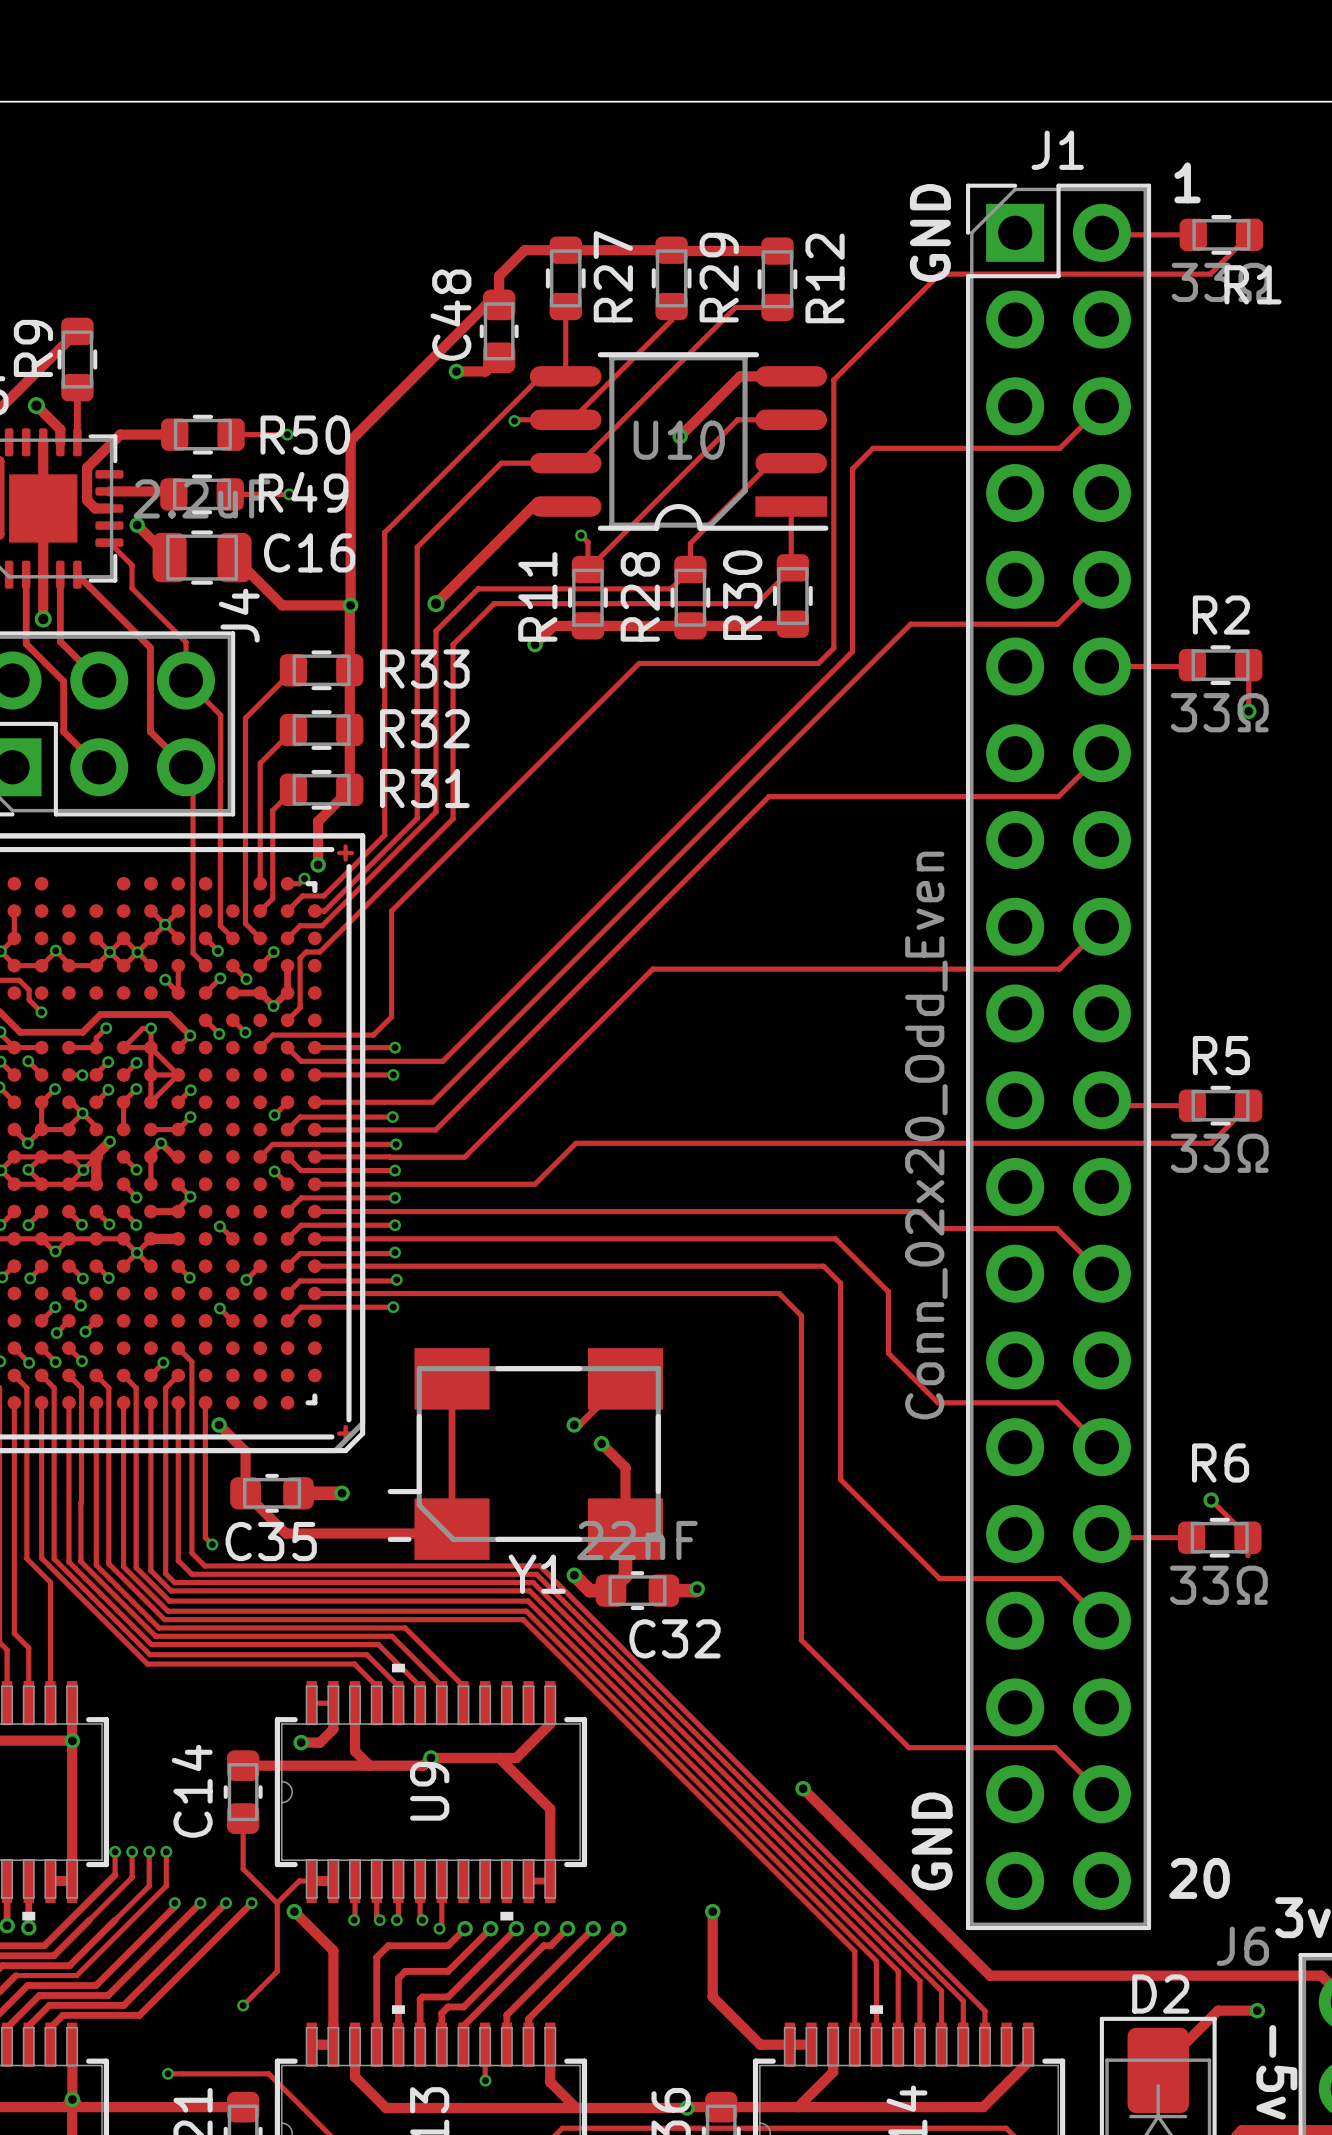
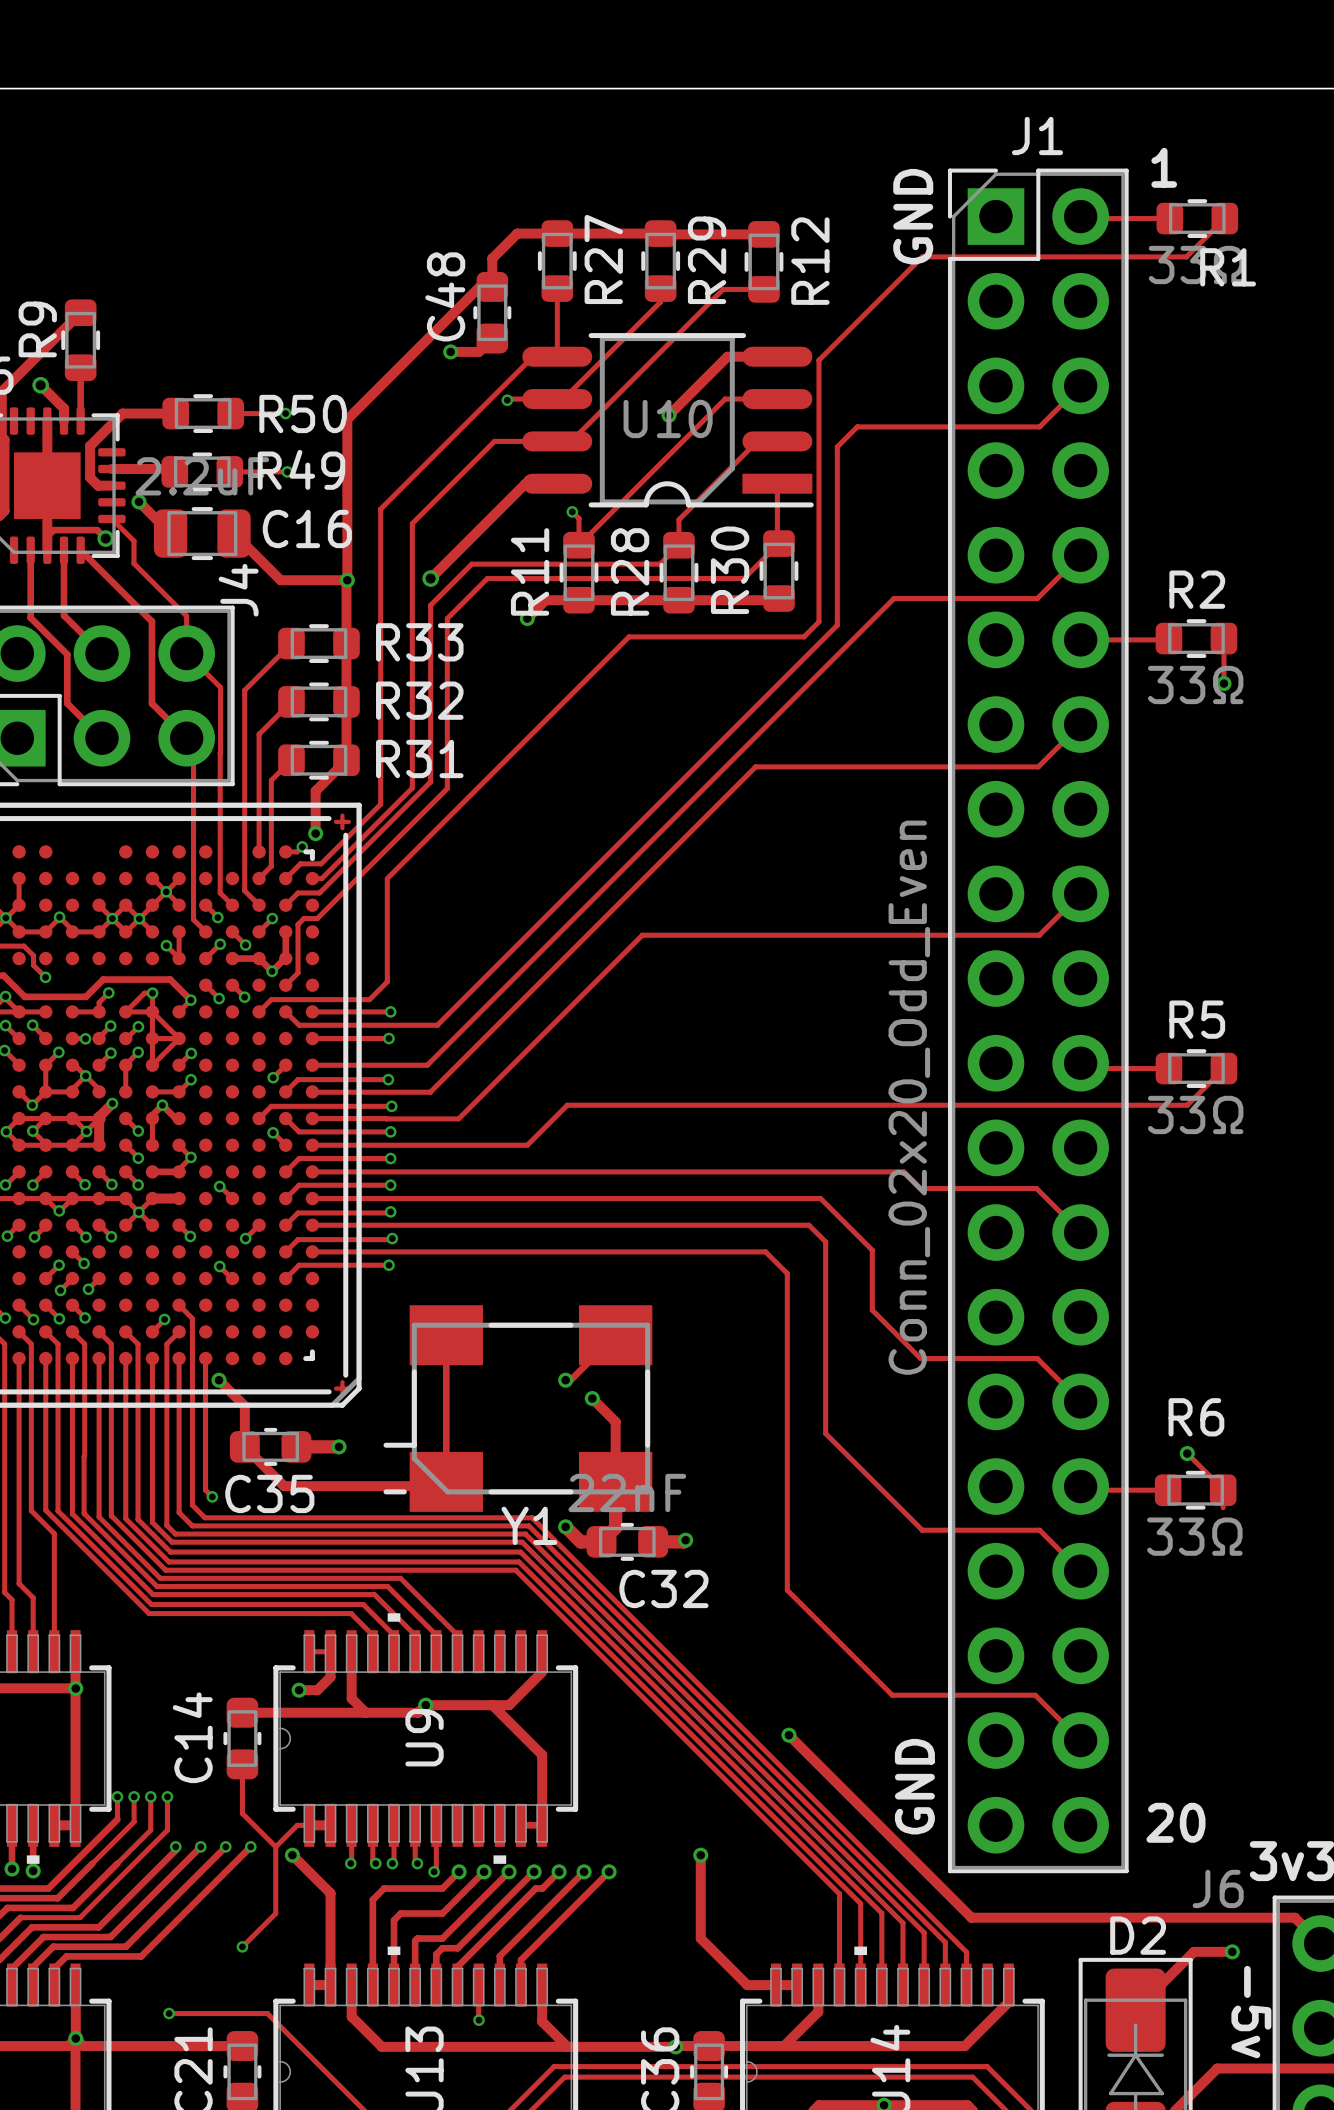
track: none -> (47, 536) (53, 530) (97, 530) (105, 538)
track: (43, 574) (43, 619) -> none
via position: (43, 619) -> (105, 538)

